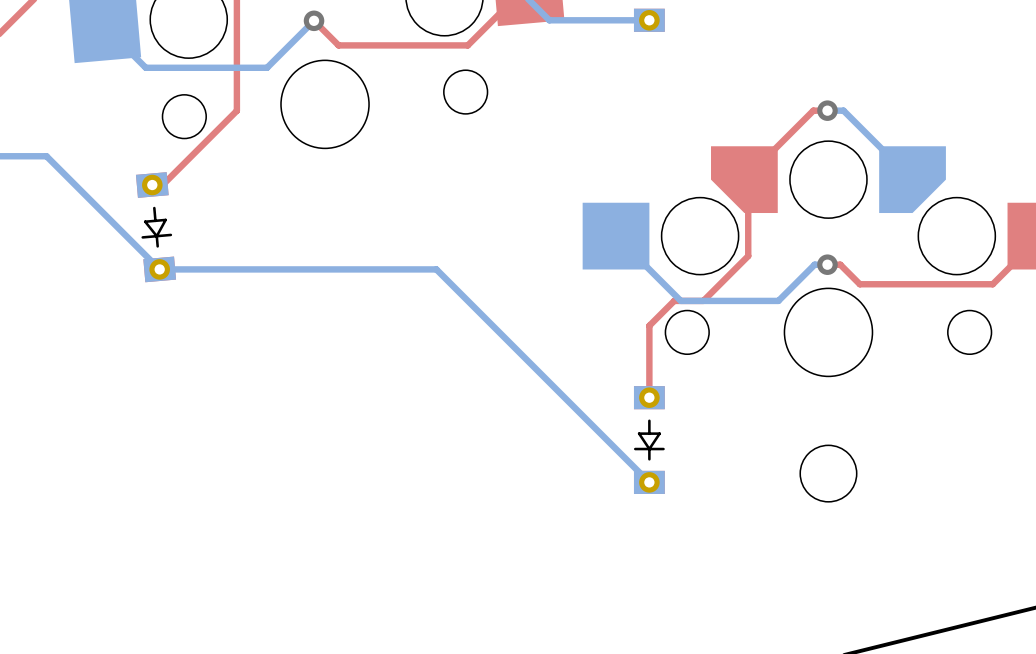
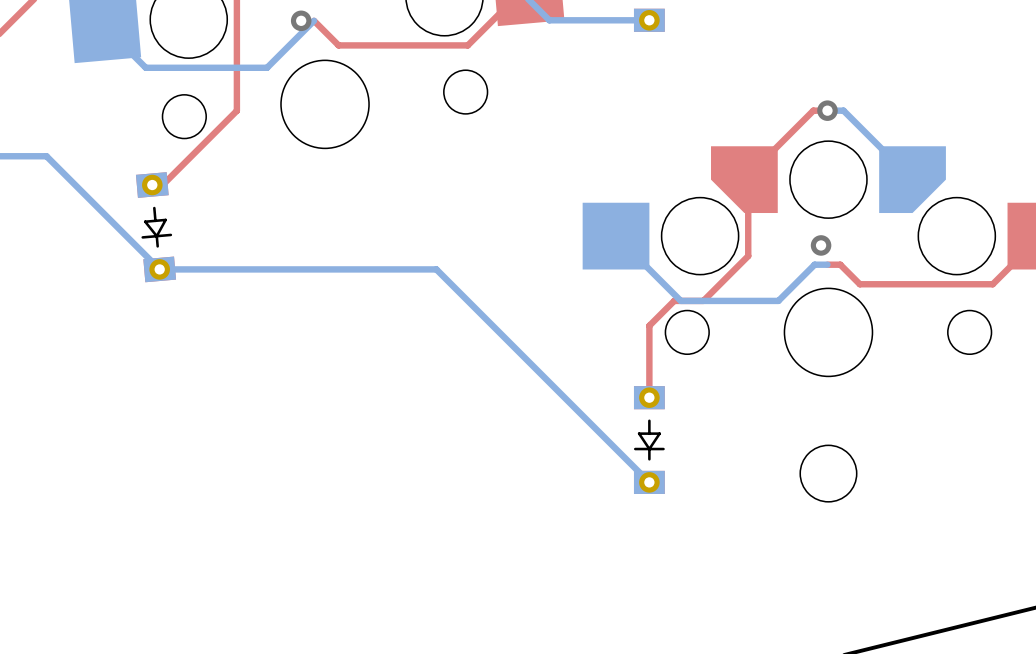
via position: (314, 20) -> (301, 20)
via position: (827, 264) -> (821, 245)

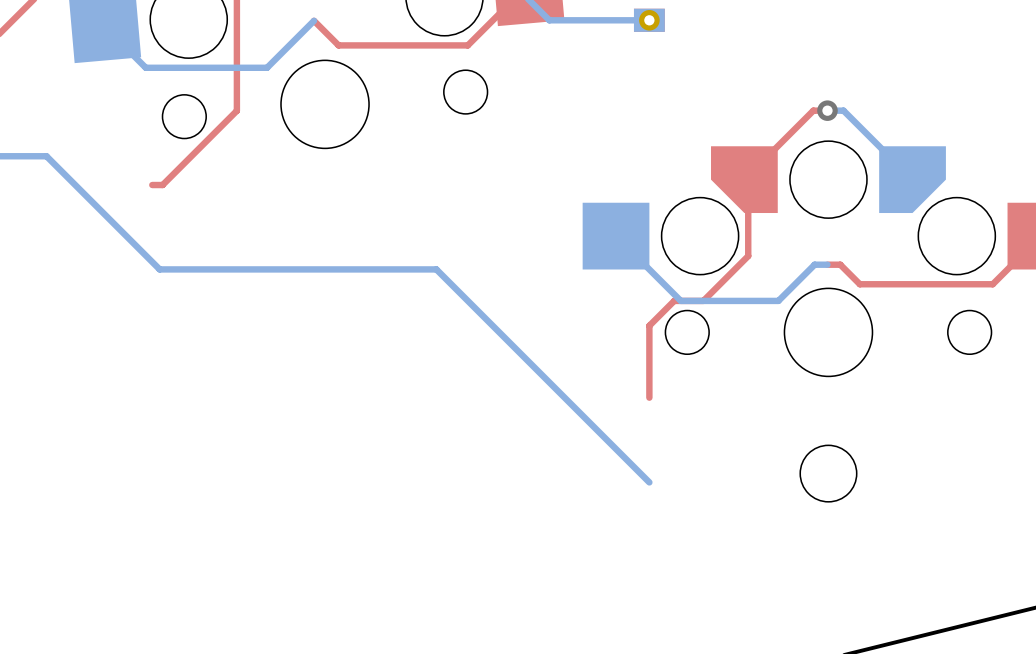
via: (301, 20) -> none
part: (156, 227) -> none
via: (821, 245) -> none
part: (649, 440) -> none

